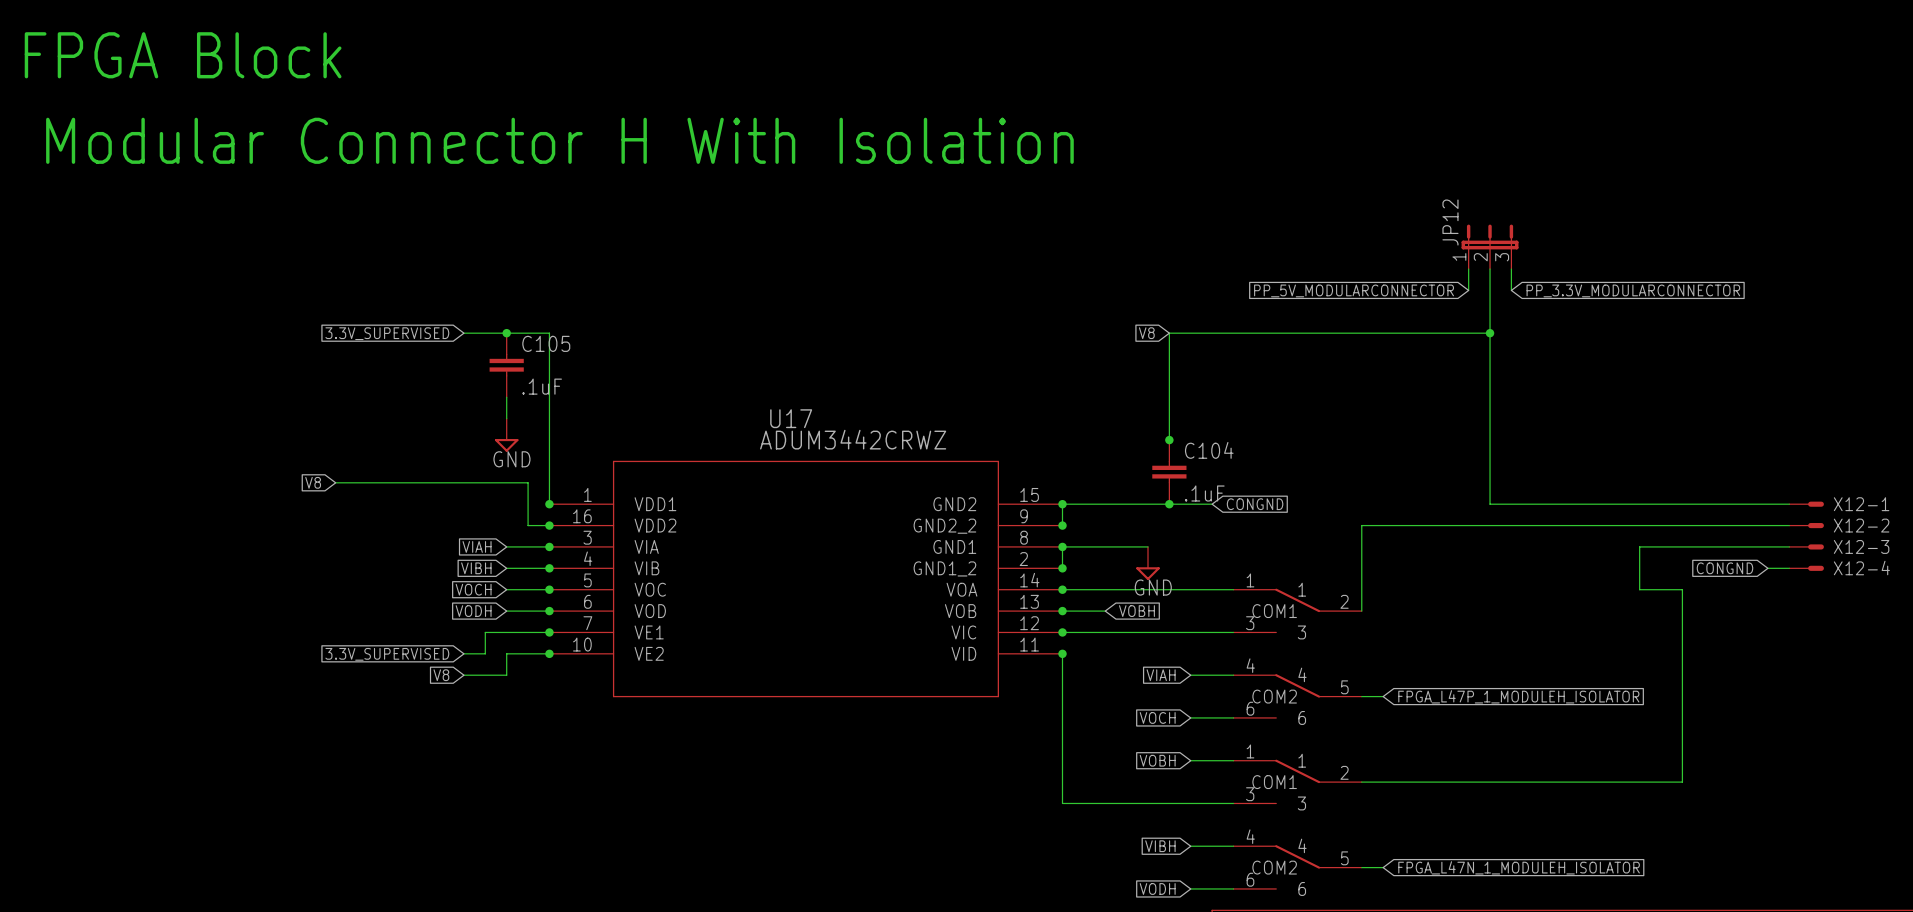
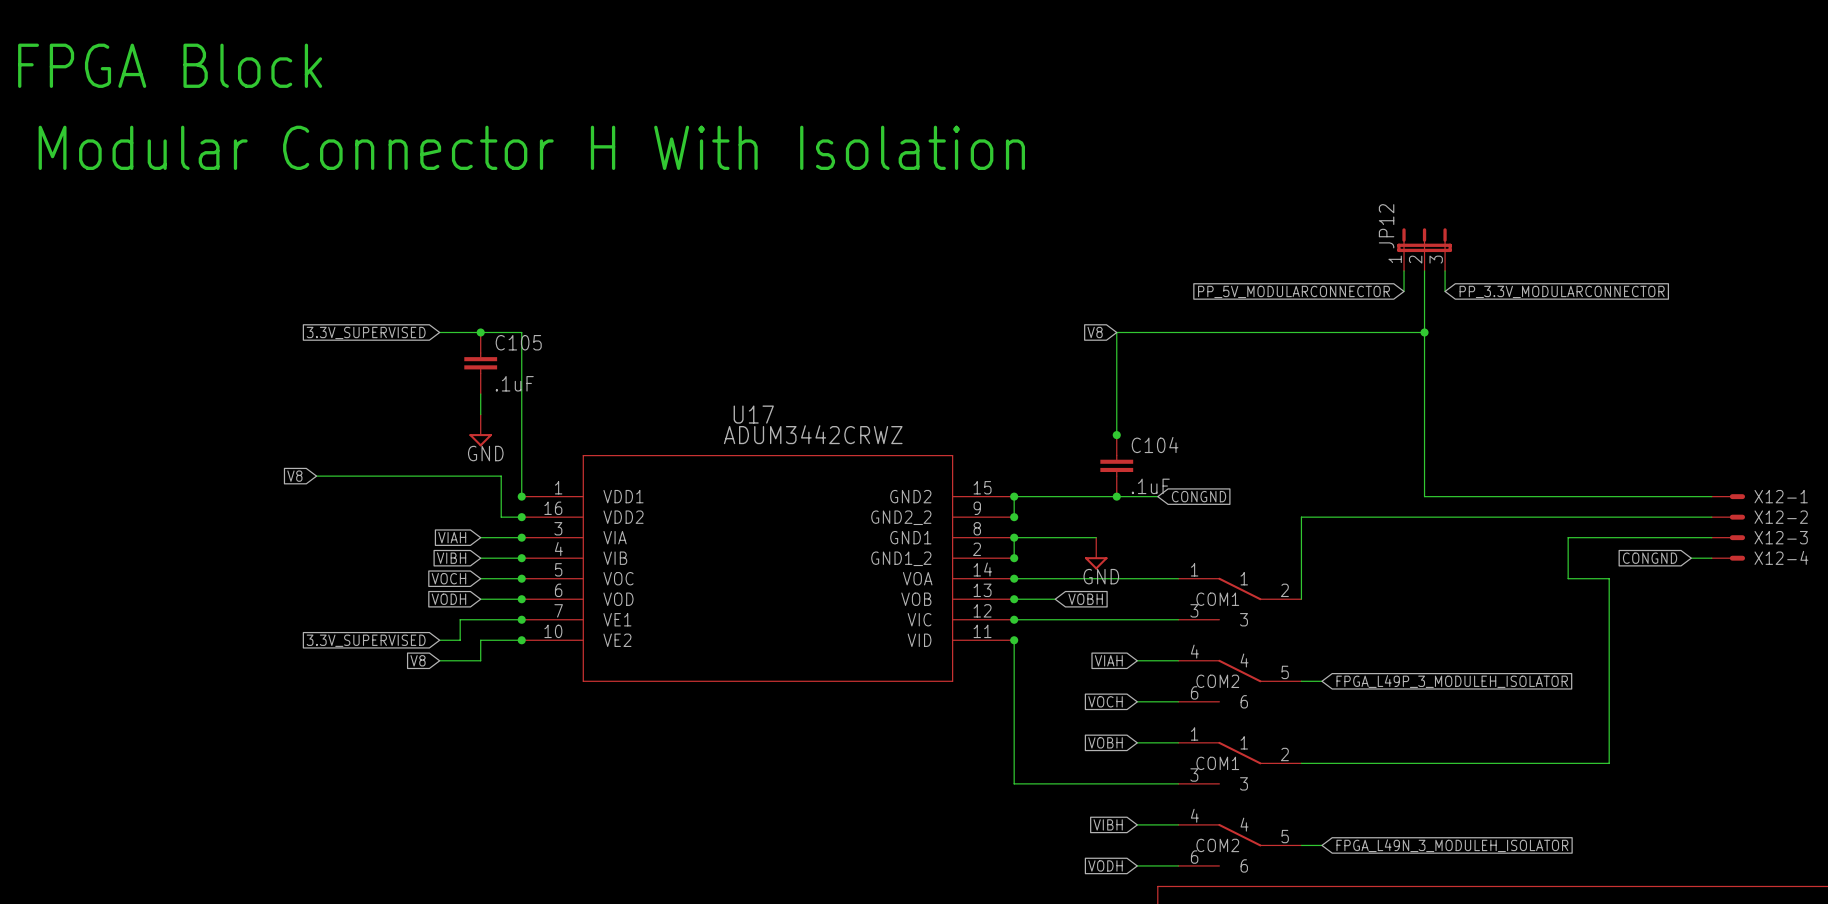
global label: FPGA_L47P_1_MODULEH_ISOLATOR (1518, 696) -> FPGA_L49P_3_MODULEH_ISOLATOR (1452, 681)
global label: FPGA_L47N_1_MODULEH_ISOLATOR (1519, 867) -> FPGA_L49N_3_MODULEH_ISOLATOR (1452, 845)

